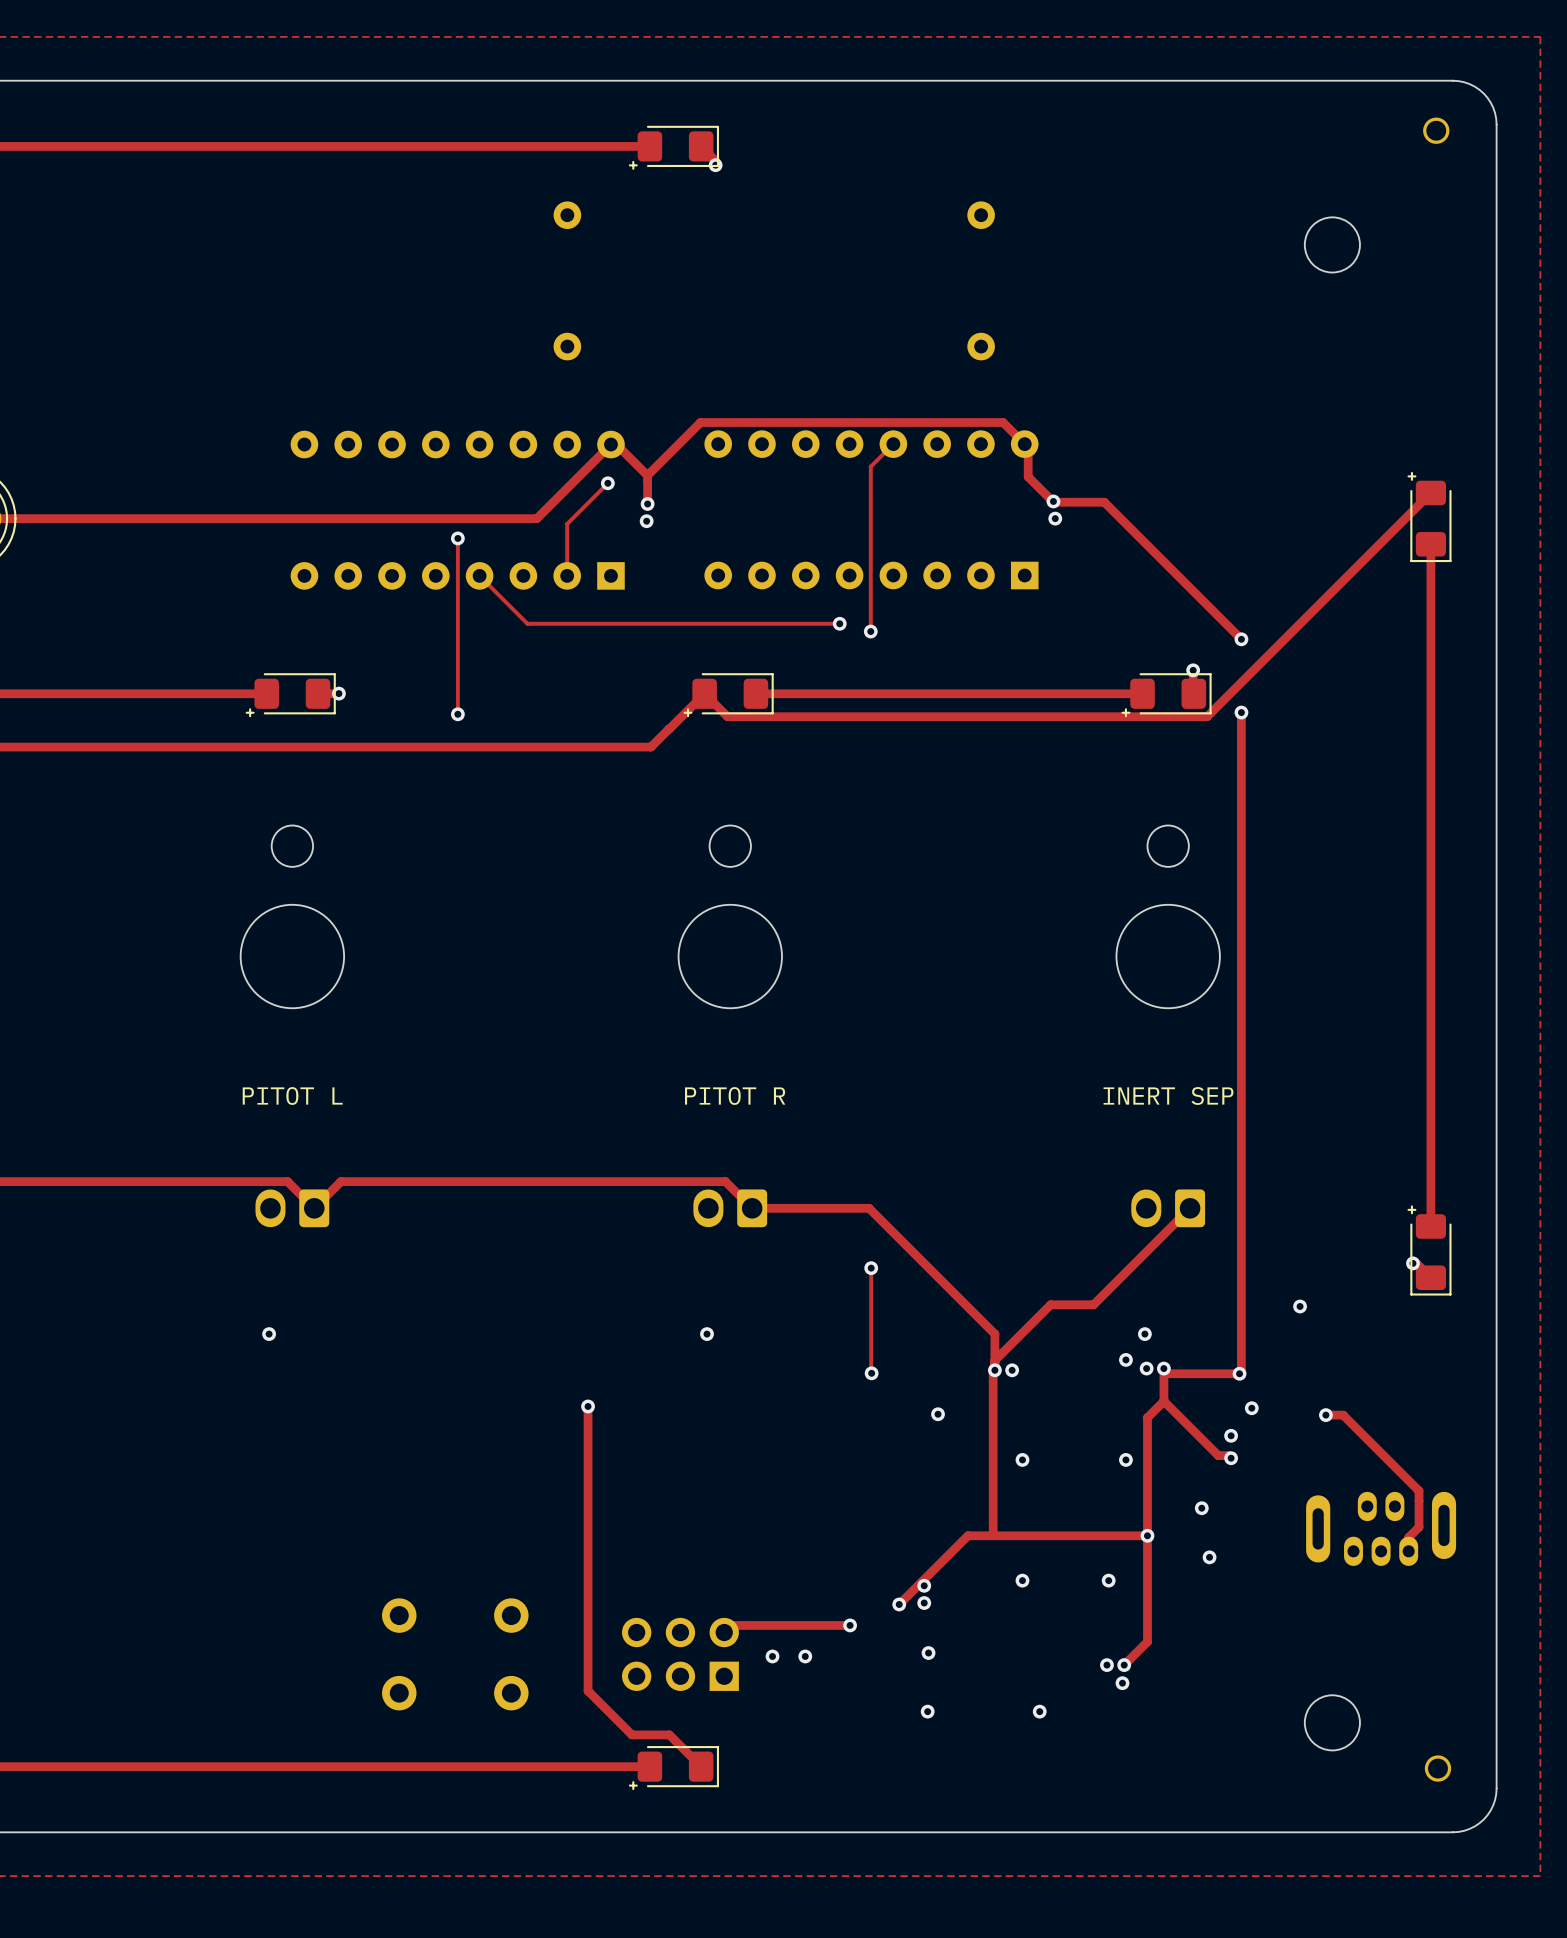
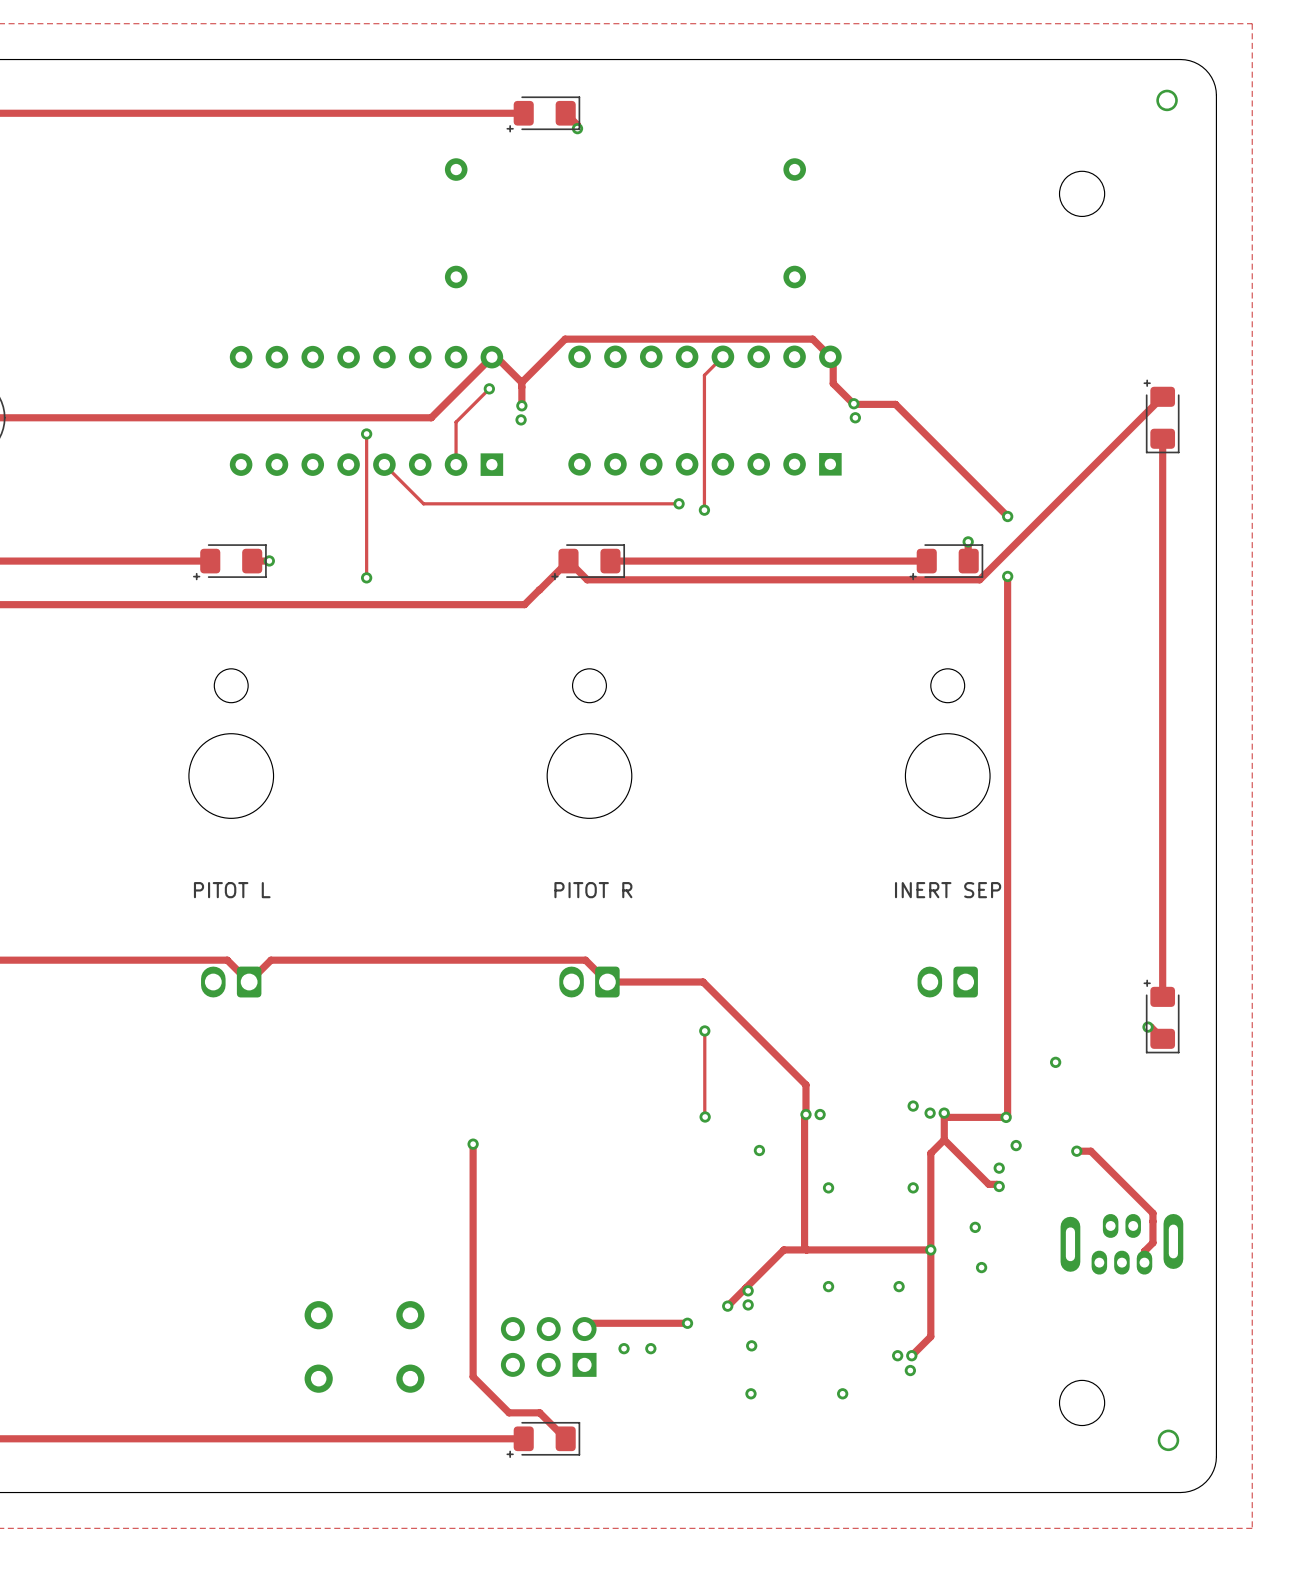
track: (1190, 1208) (1093, 1304) (1050, 1304) (994, 1360) -> none
via: (269, 1334) -> none
via: (707, 1334) -> none
via: (1144, 1334) -> none

